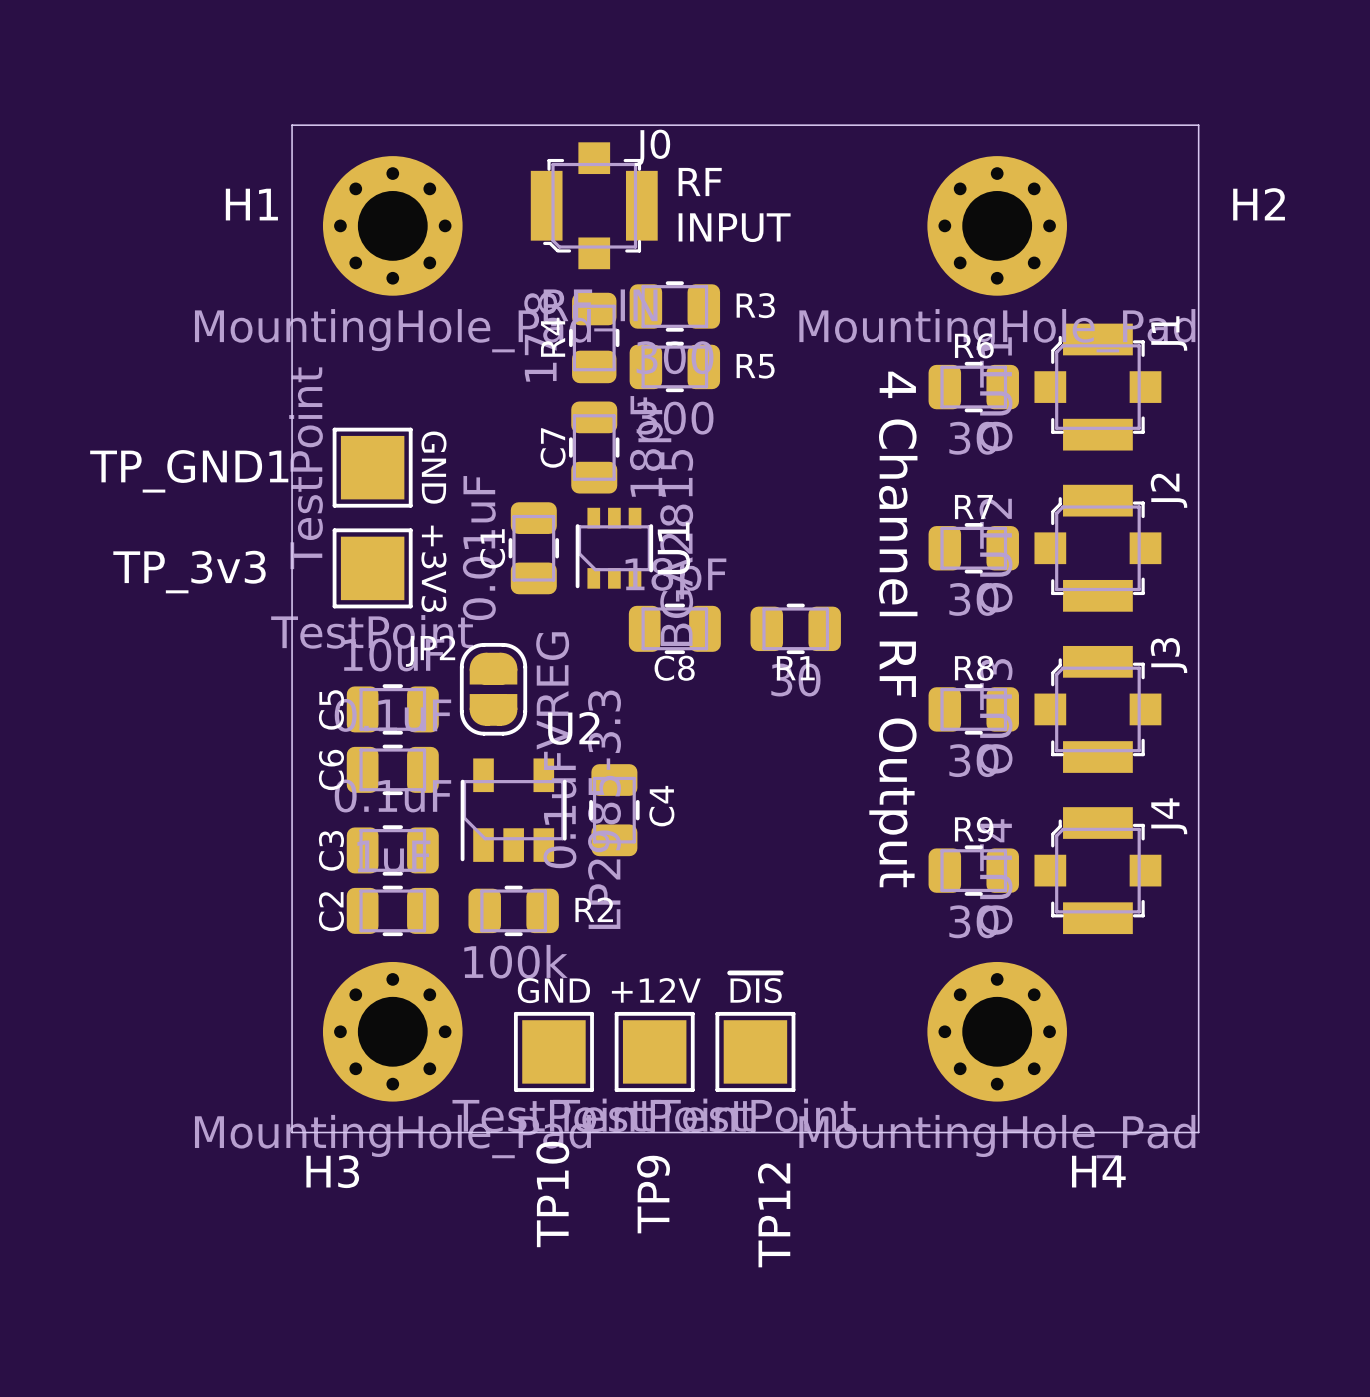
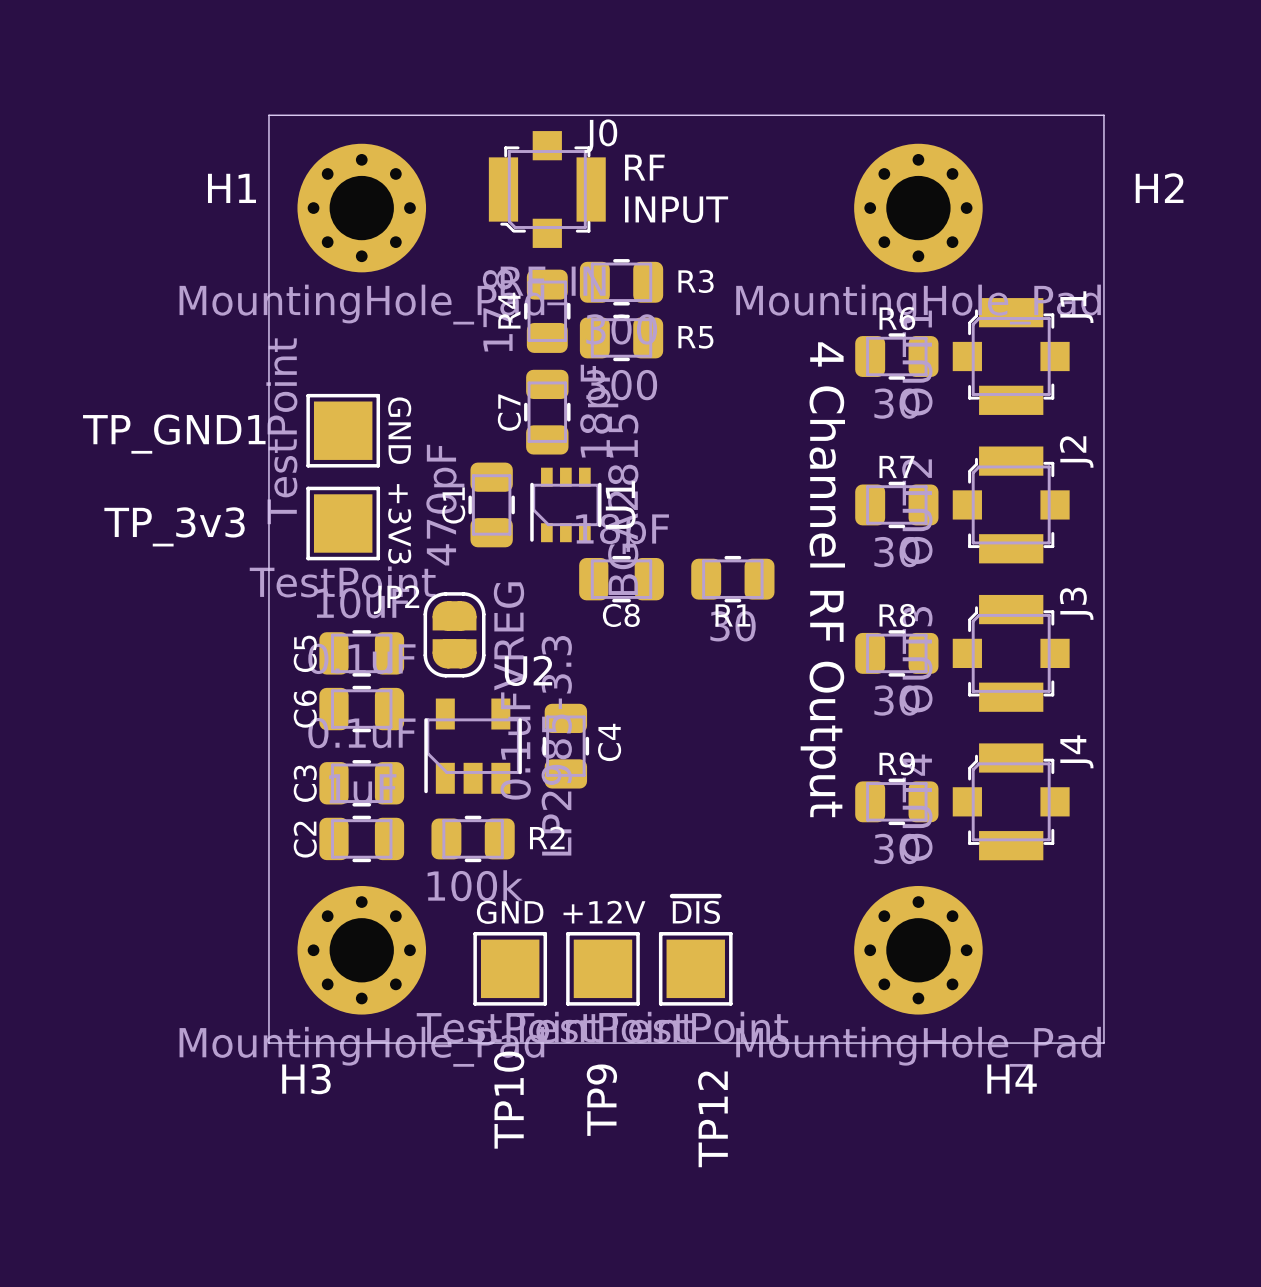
C1 value: 0.01uF (479, 548) -> 470pF (445, 505)

